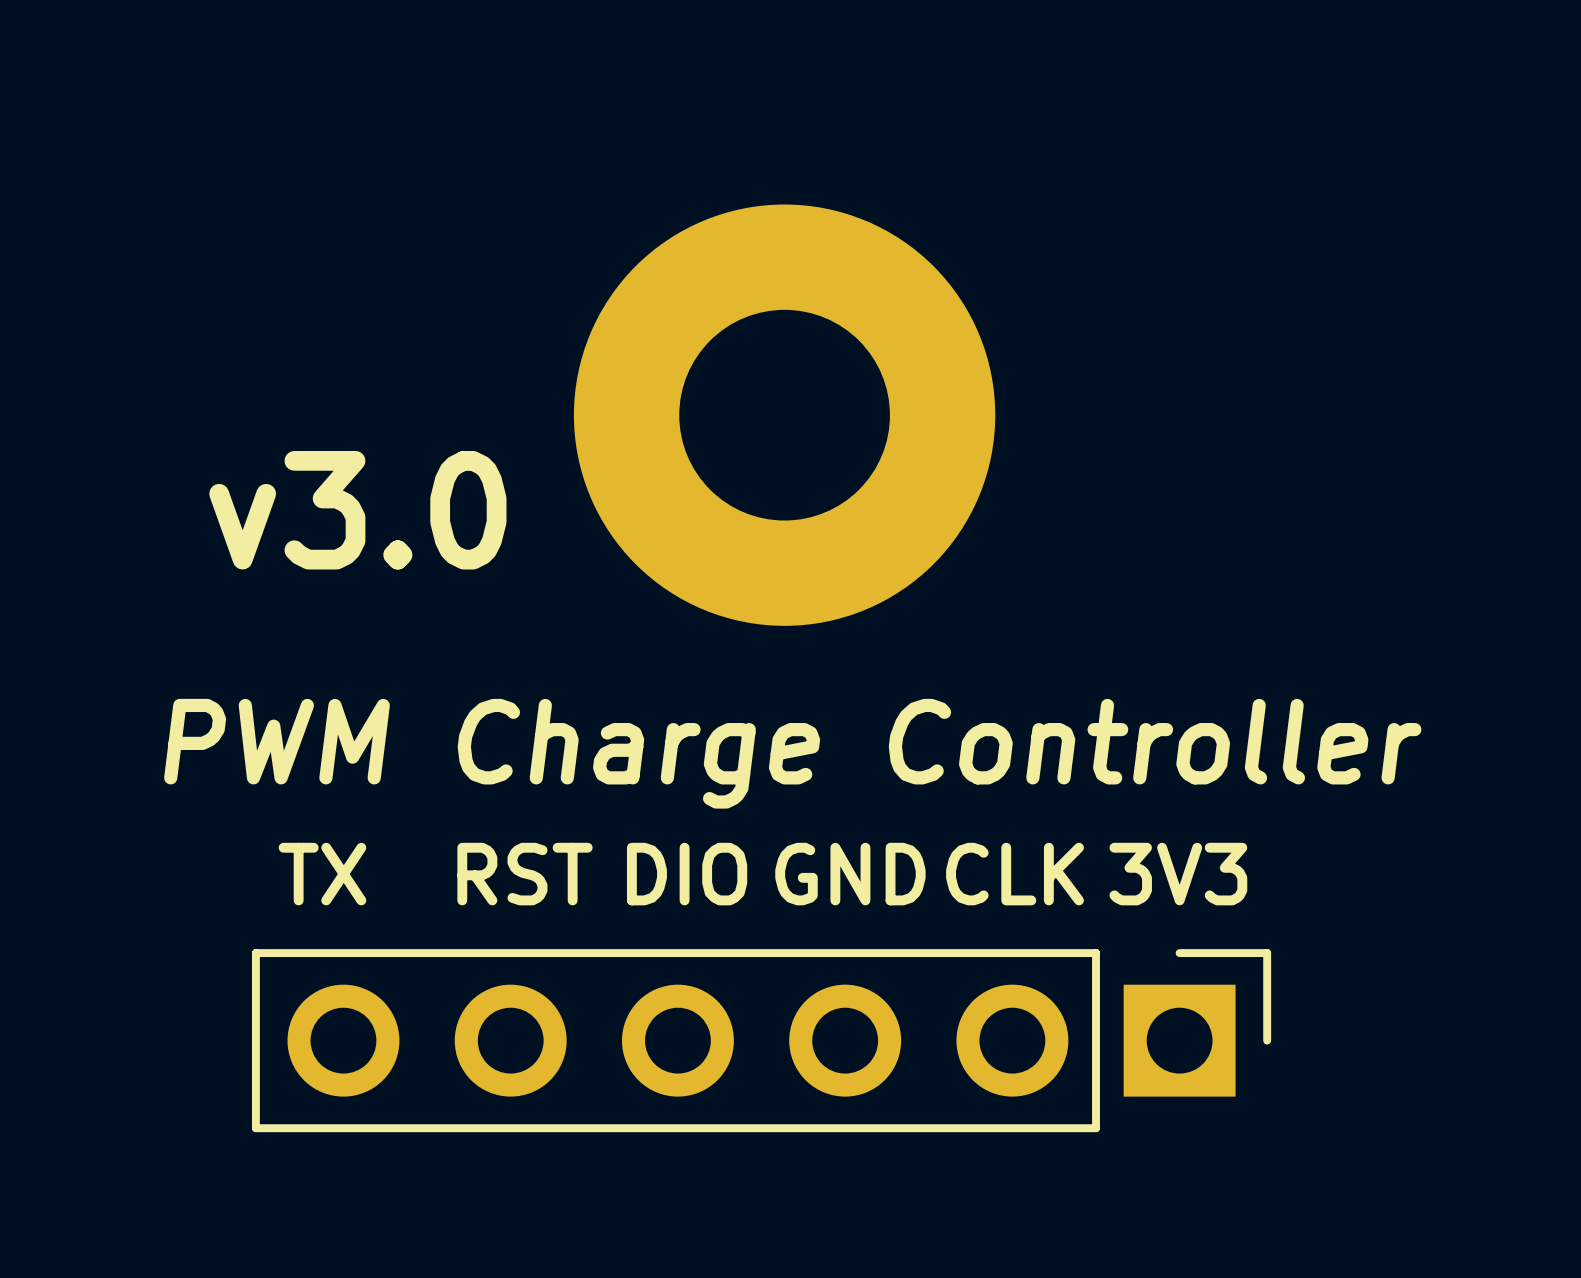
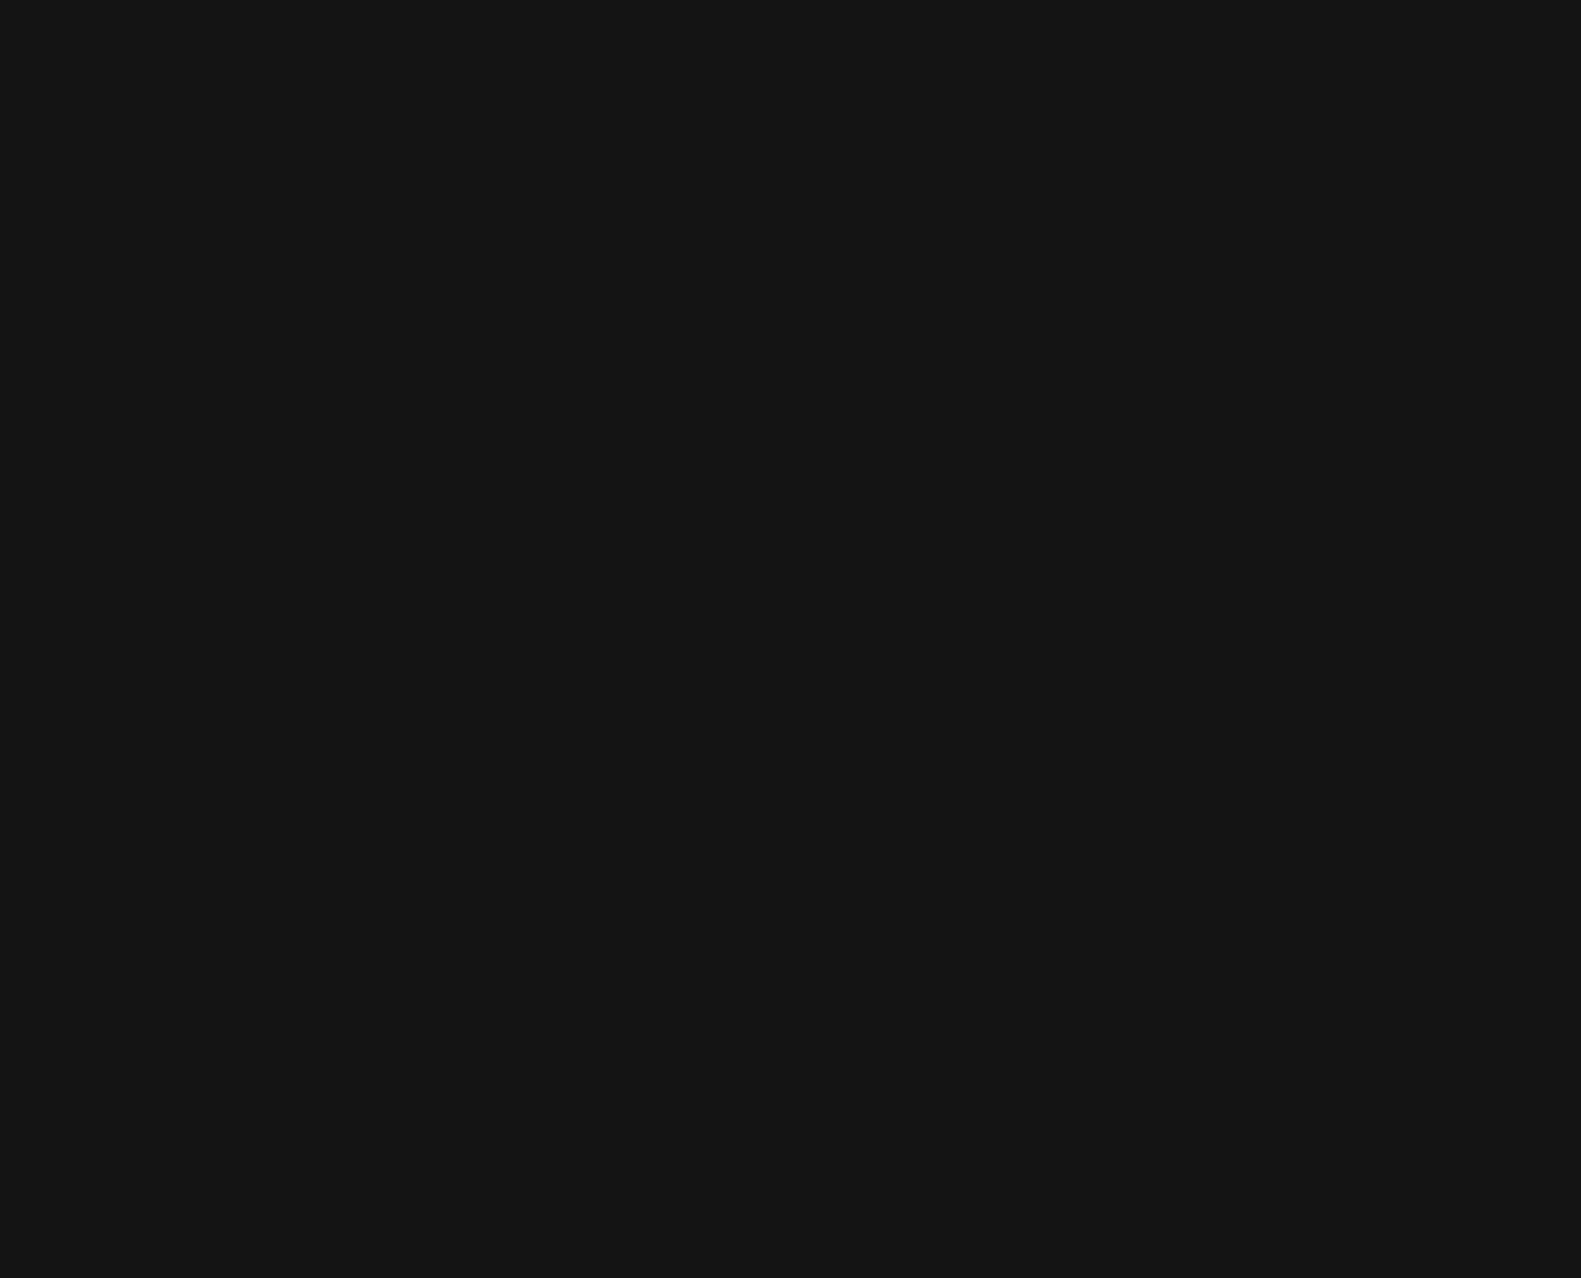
part: (784, 415) -> none
text: v3.0 (357, 510) -> none
text: PWM Charge Controller (792, 753) -> none
text: TX (322, 874) -> none
text: RST (525, 874) -> none
text: DIO (687, 874) -> none
text: GND (850, 874) -> none
text: CLK (1015, 874) -> none
text: 3V3 (1178, 874) -> none
part: (761, 1040) -> none

